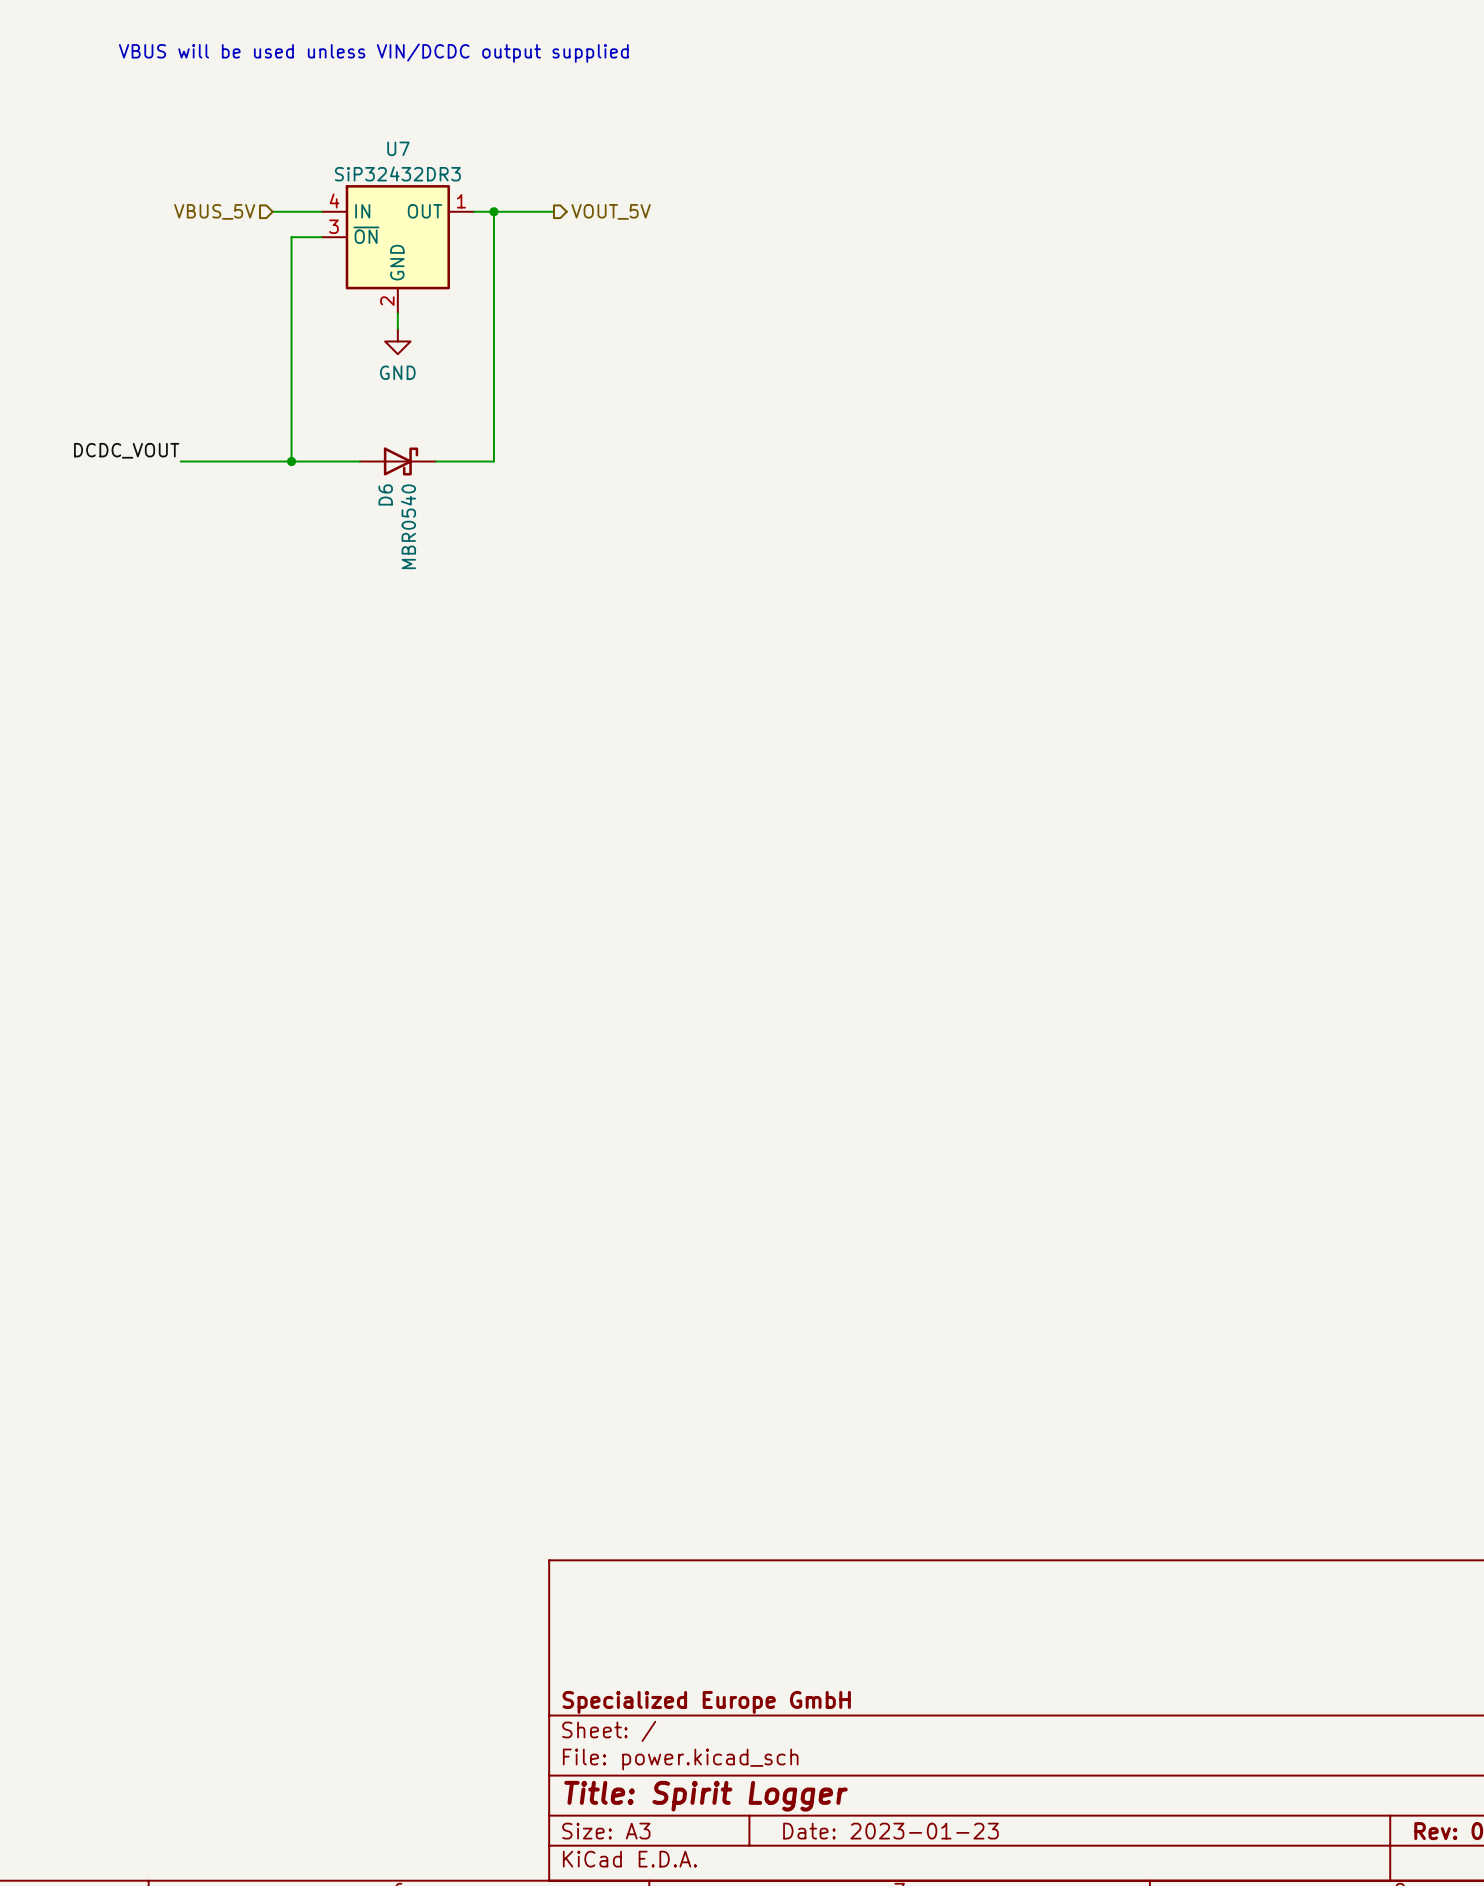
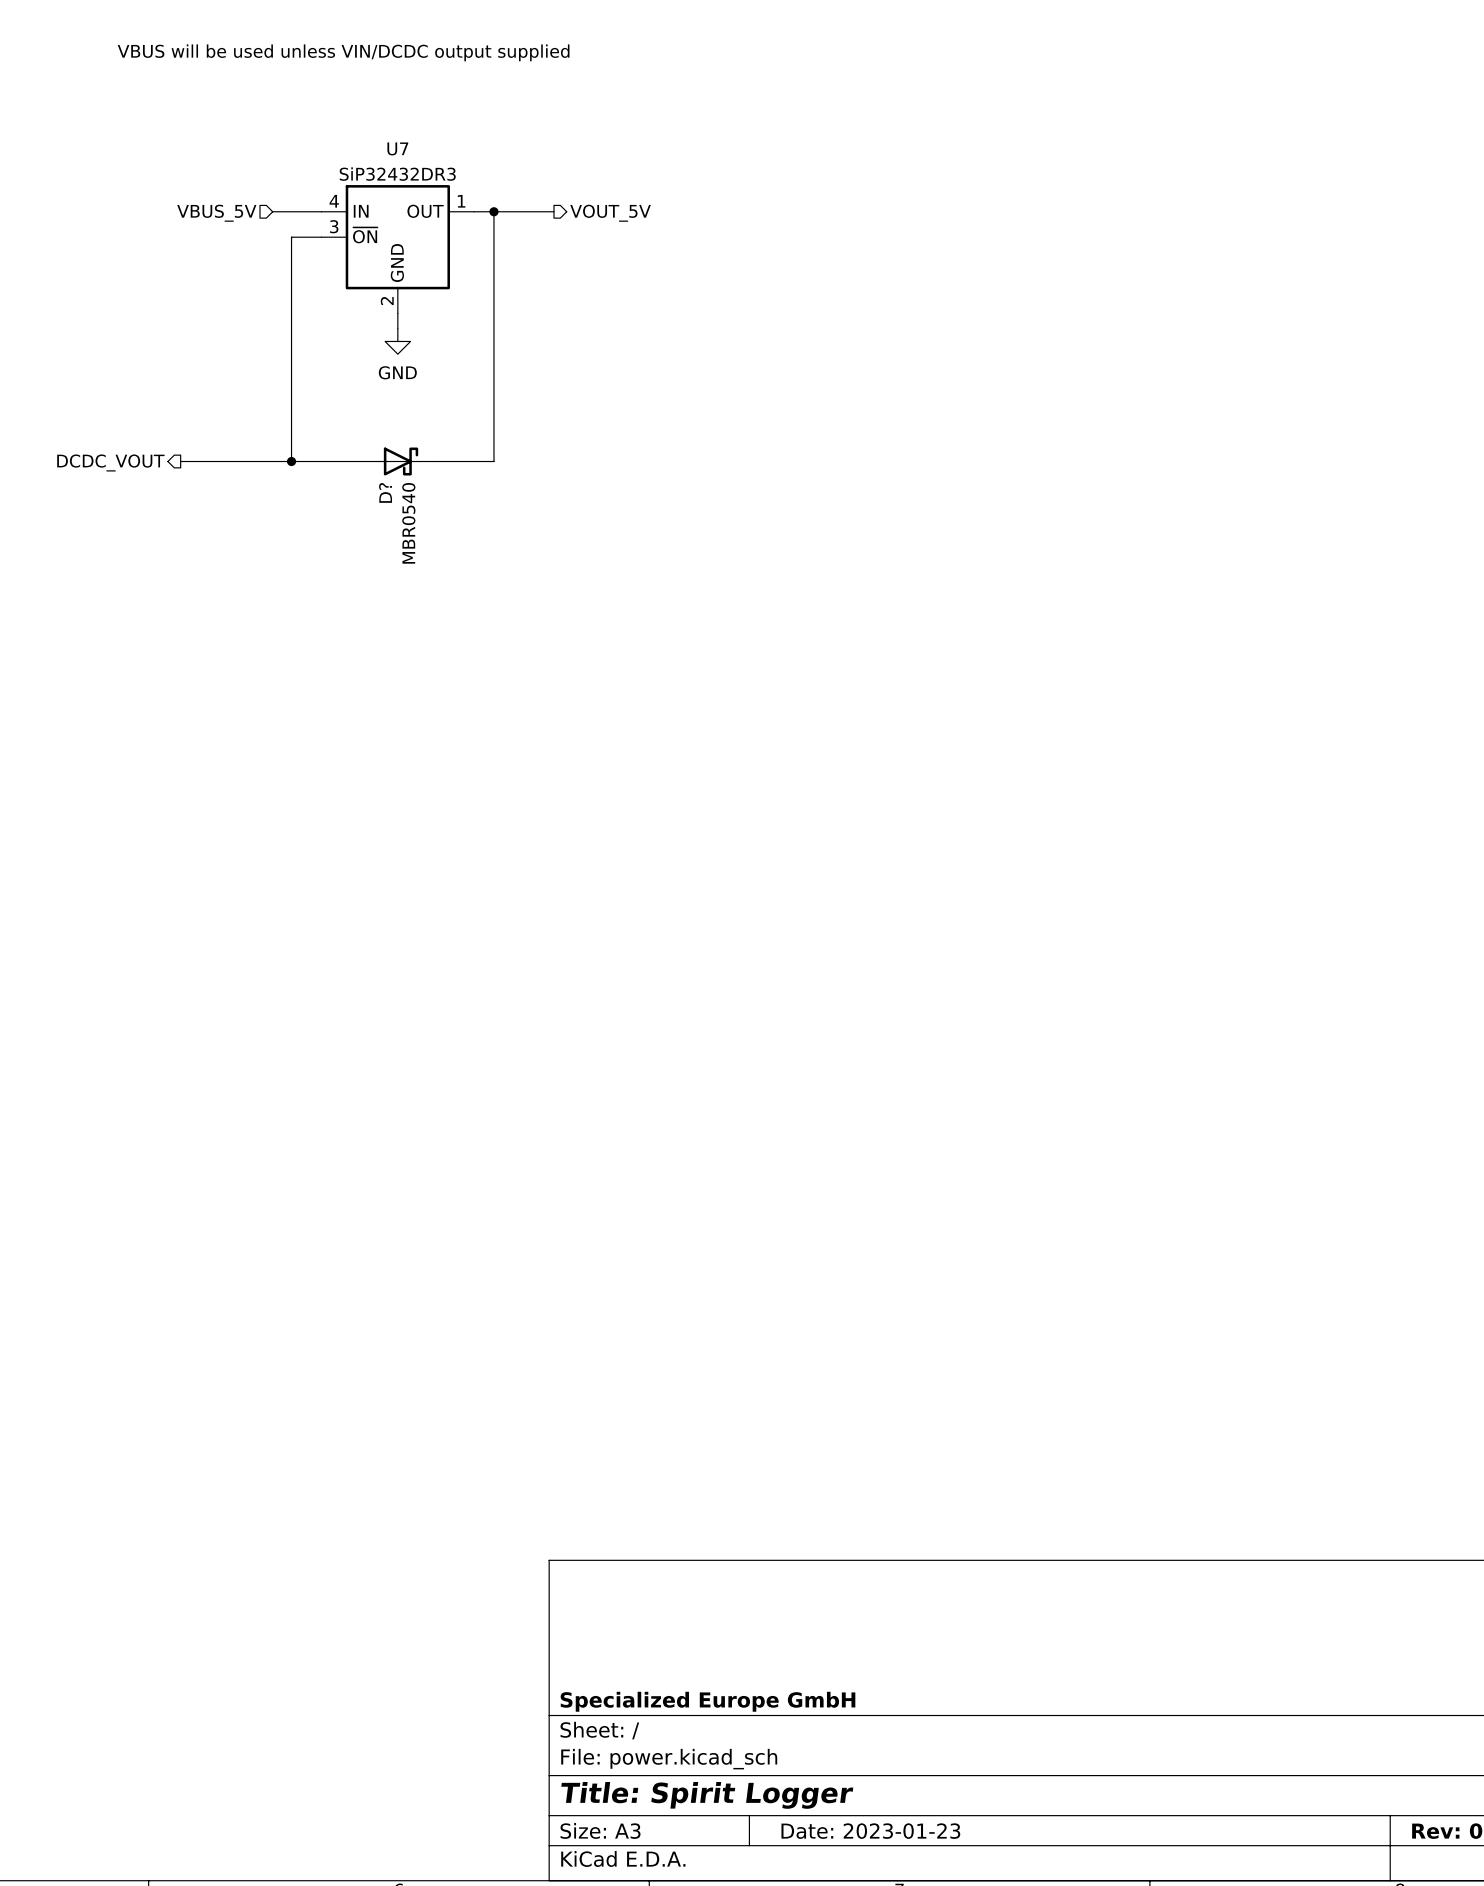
label: DCDC_VOUT (126, 450) -> none
hierarchical label: none -> DCDC_VOUT (110, 462)
D6 name: D6 (385, 494) -> D? (385, 492)

